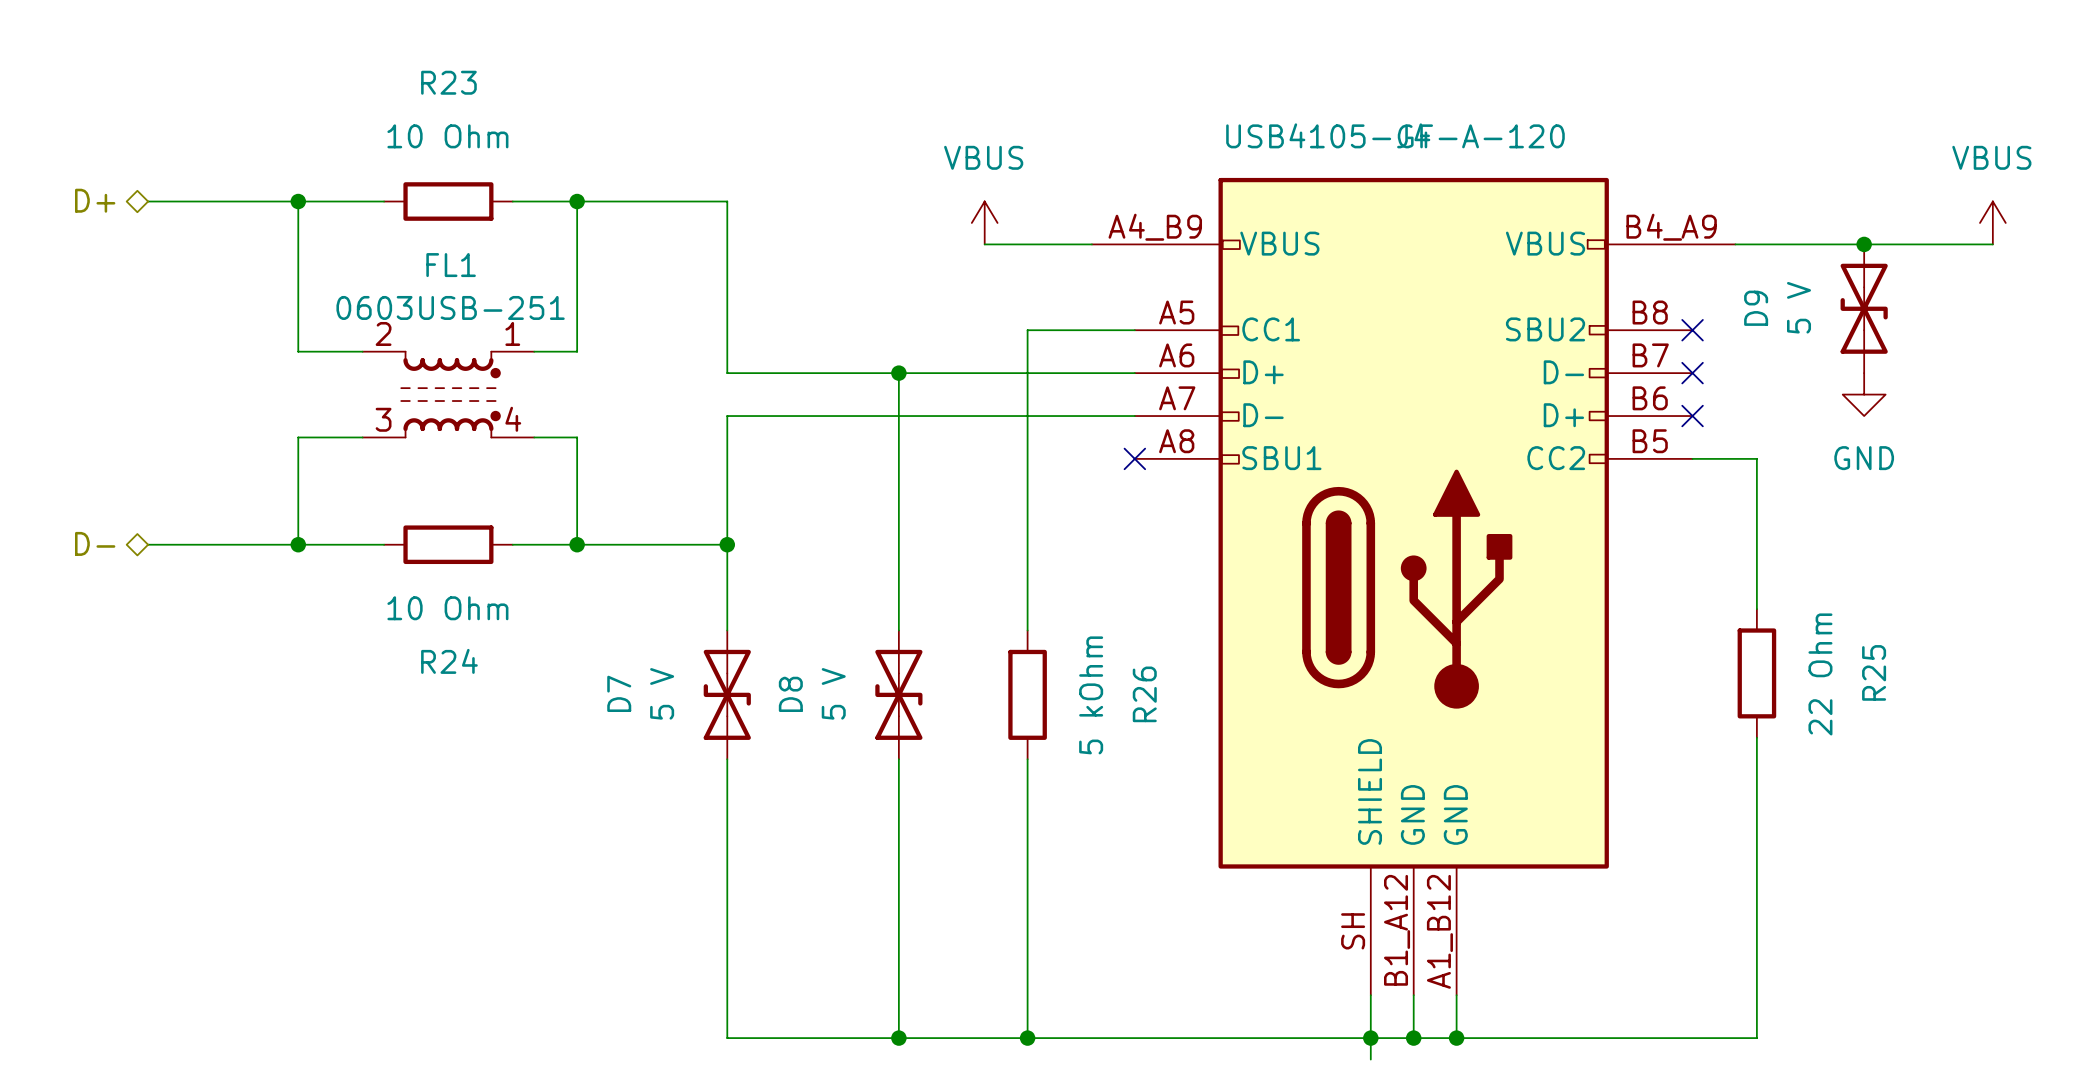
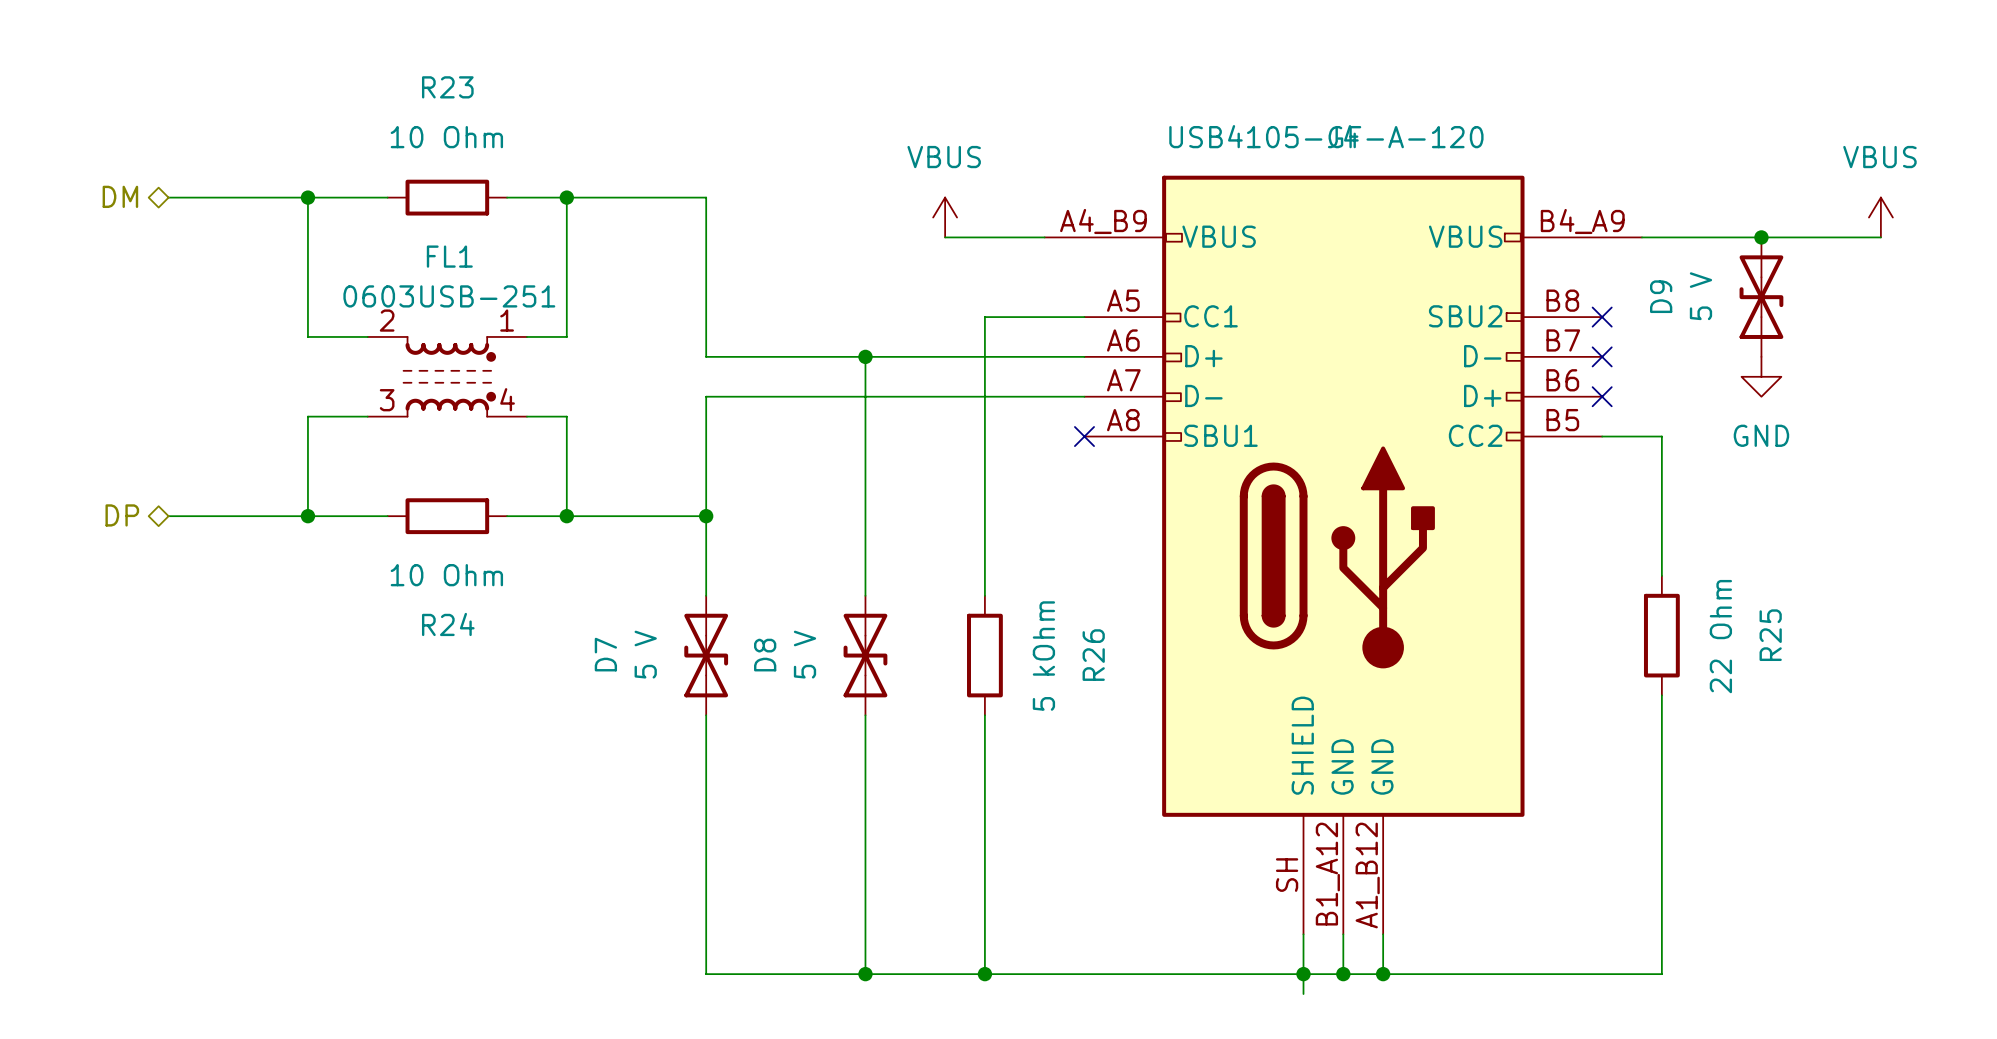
hierarchical label: D+ (95, 200) -> DM (120, 196)
hierarchical label: D- (95, 543) -> DP (122, 515)

